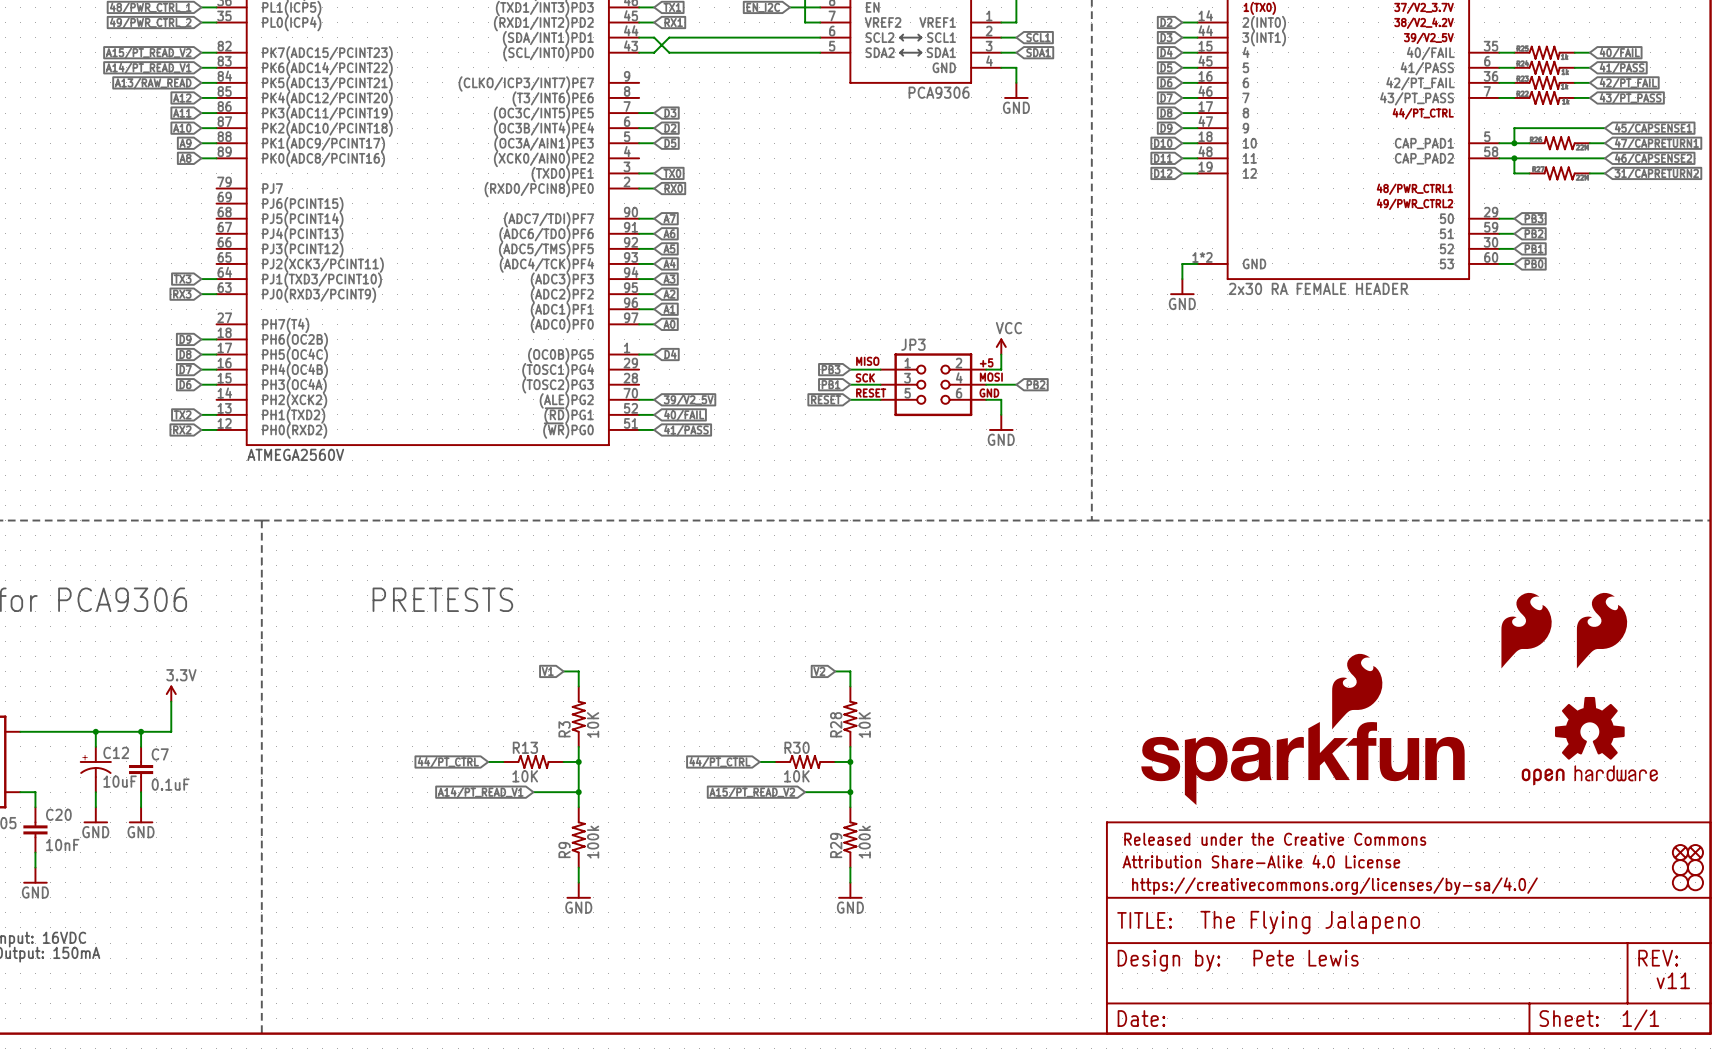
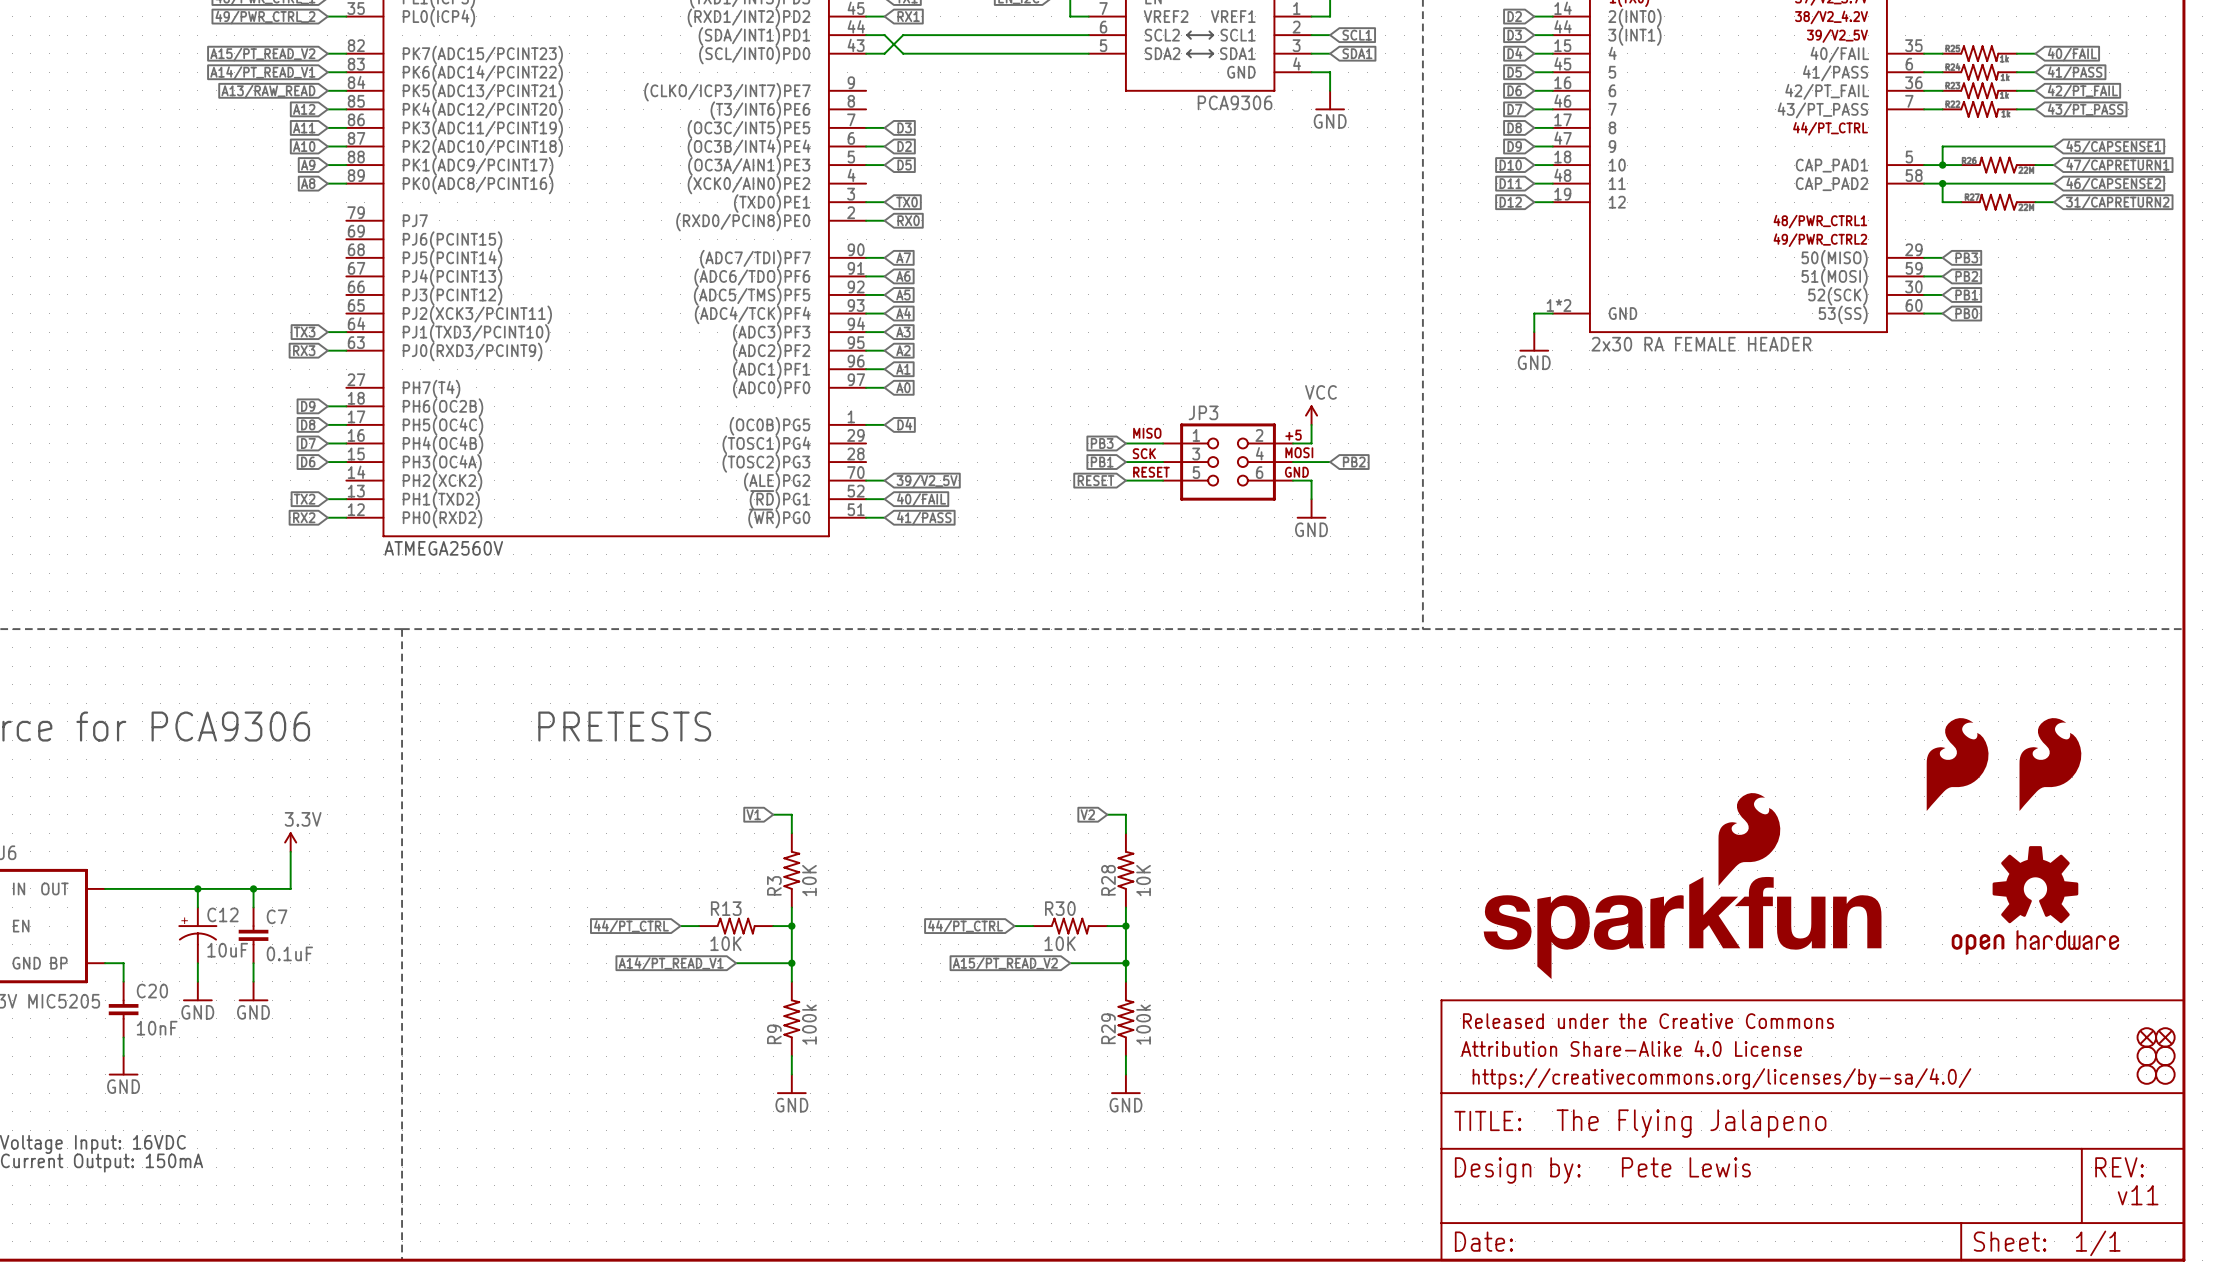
part pin name: 50 (1446, 218) -> 50(MISO) (1834, 259)
part pin name: 51 (1446, 233) -> 51(MOSI) (1834, 277)
part pin name: 52 (1446, 248) -> 52(SCK) (1837, 296)
part pin name: 53 (1446, 263) -> 53(SS) (1843, 314)

